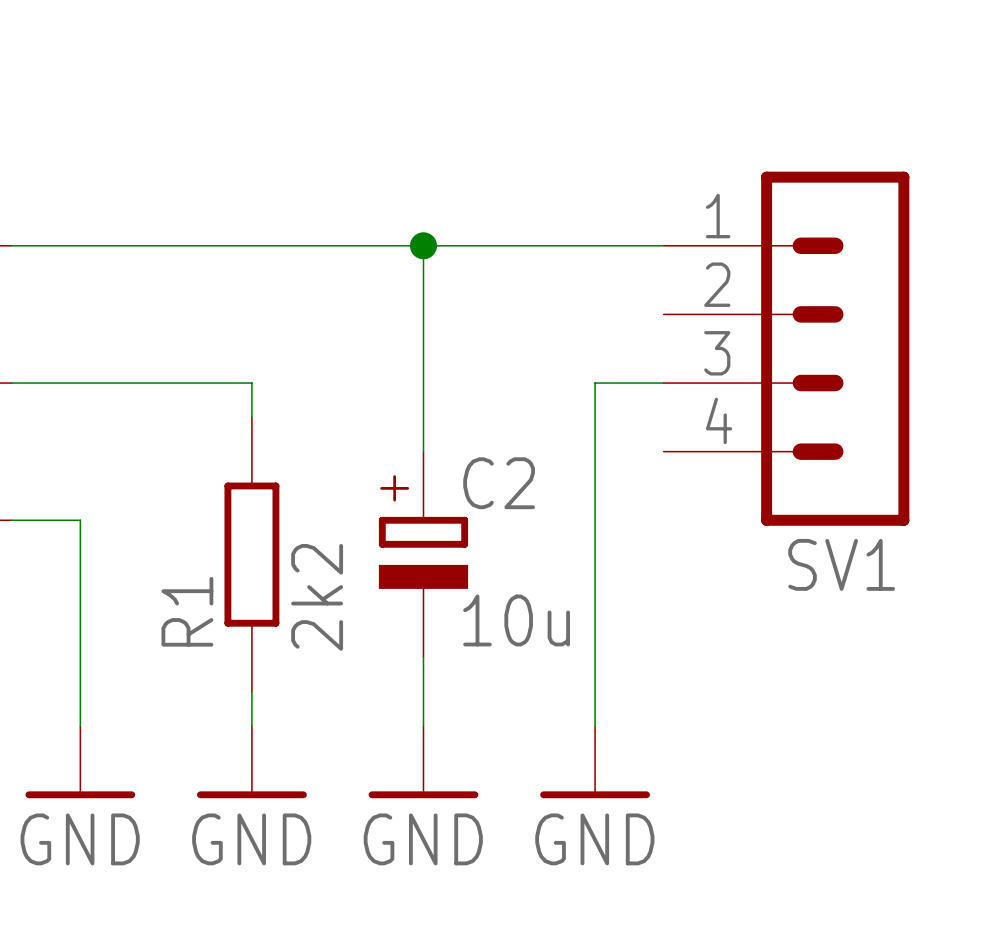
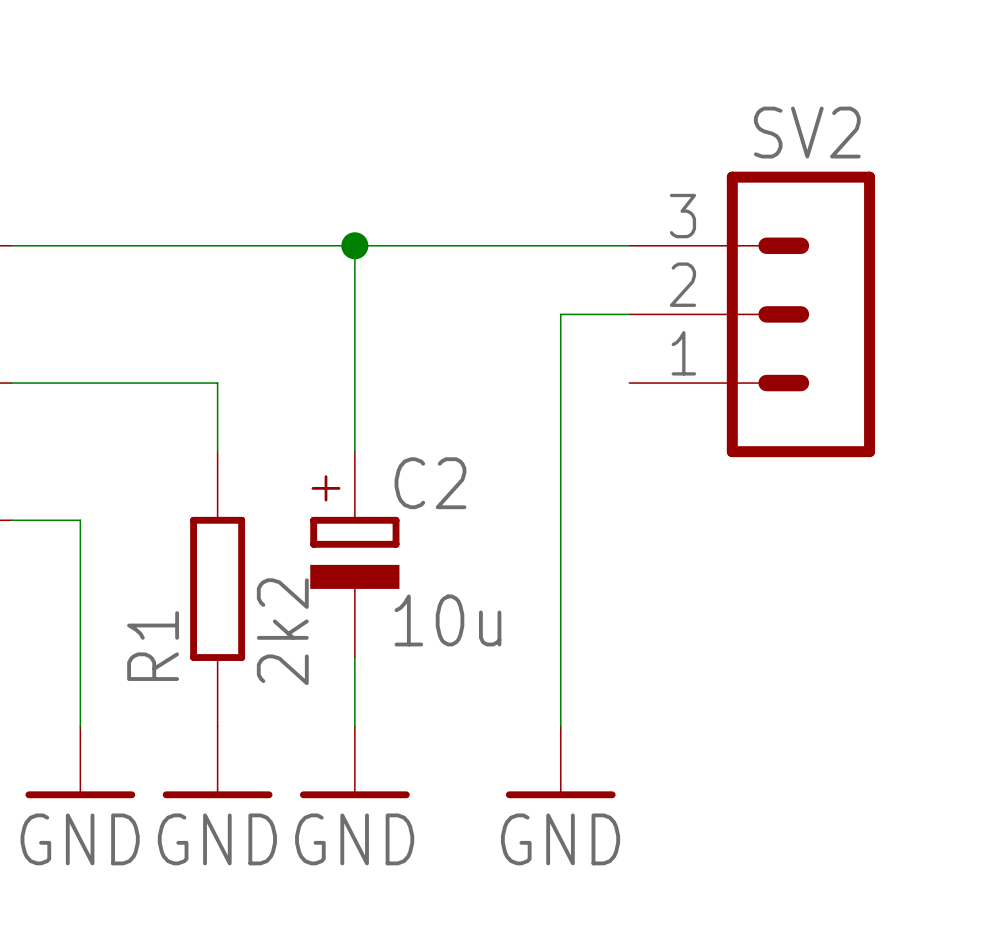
wire: (423, 245) (423, 451) -> (354, 245) (354, 451)
junction position: (423, 245) -> (354, 245)
wire: none -> (629, 314) (560, 314) (560, 726)
SV2: none -> (752, 314)
SV1: (786, 348) -> none
wire: (217, 383) (251, 383) (251, 417) -> (217, 383) (217, 451)
wire: (663, 383) (595, 383) (595, 726) -> none
R1 position: (251, 554) -> (217, 588)
C2 position: (423, 554) -> (354, 554)
wire: (423, 657) (423, 726) -> (354, 657) (354, 726)
wire: (251, 691) (251, 726) -> none
power symbol position: GND (251, 762) -> GND (217, 762)
power symbol: none -> GND (354, 762)
power symbol: GND (423, 762) -> none
power symbol position: GND (595, 762) -> GND (560, 762)

